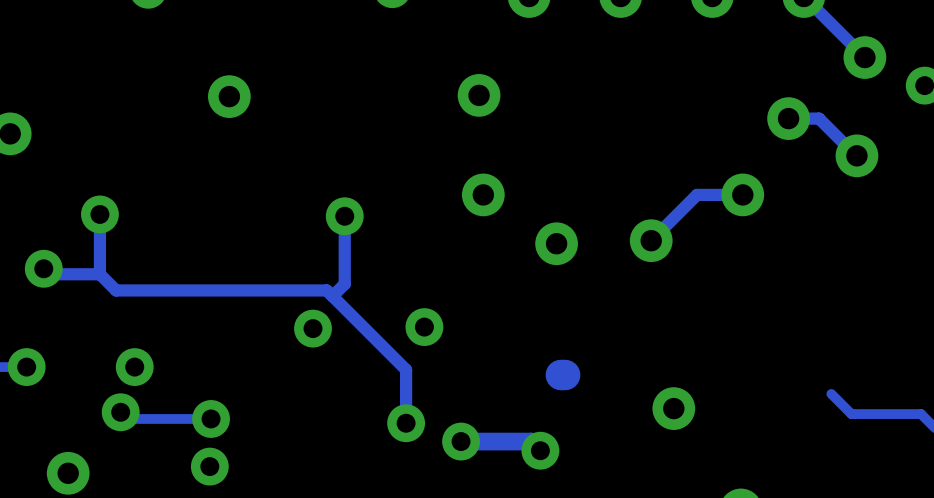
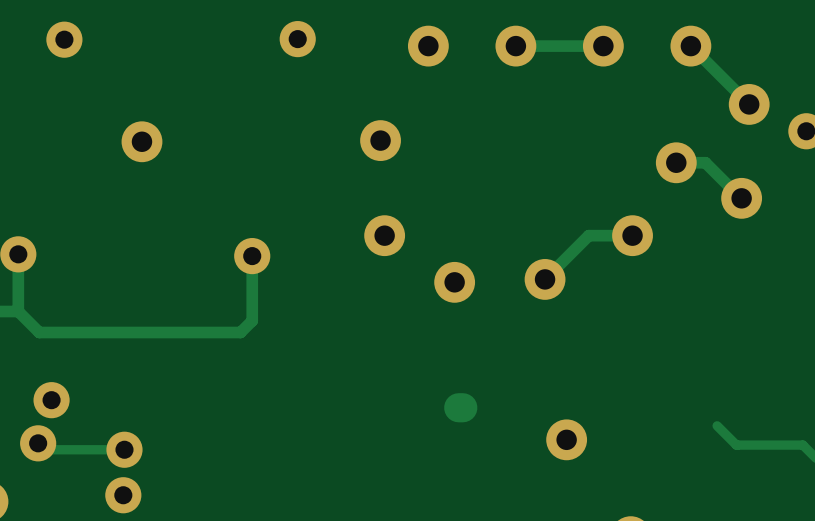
track: (116, 290) (326, 290) (406, 369) (406, 423) -> (33, 326) (39, 332) (240, 332)
via: (424, 327) -> none
via: (313, 328) -> none
via: (406, 423) -> none
track: (461, 441) (531, 441) (540, 450) -> none
via: (461, 441) -> none
via: (540, 450) -> none

